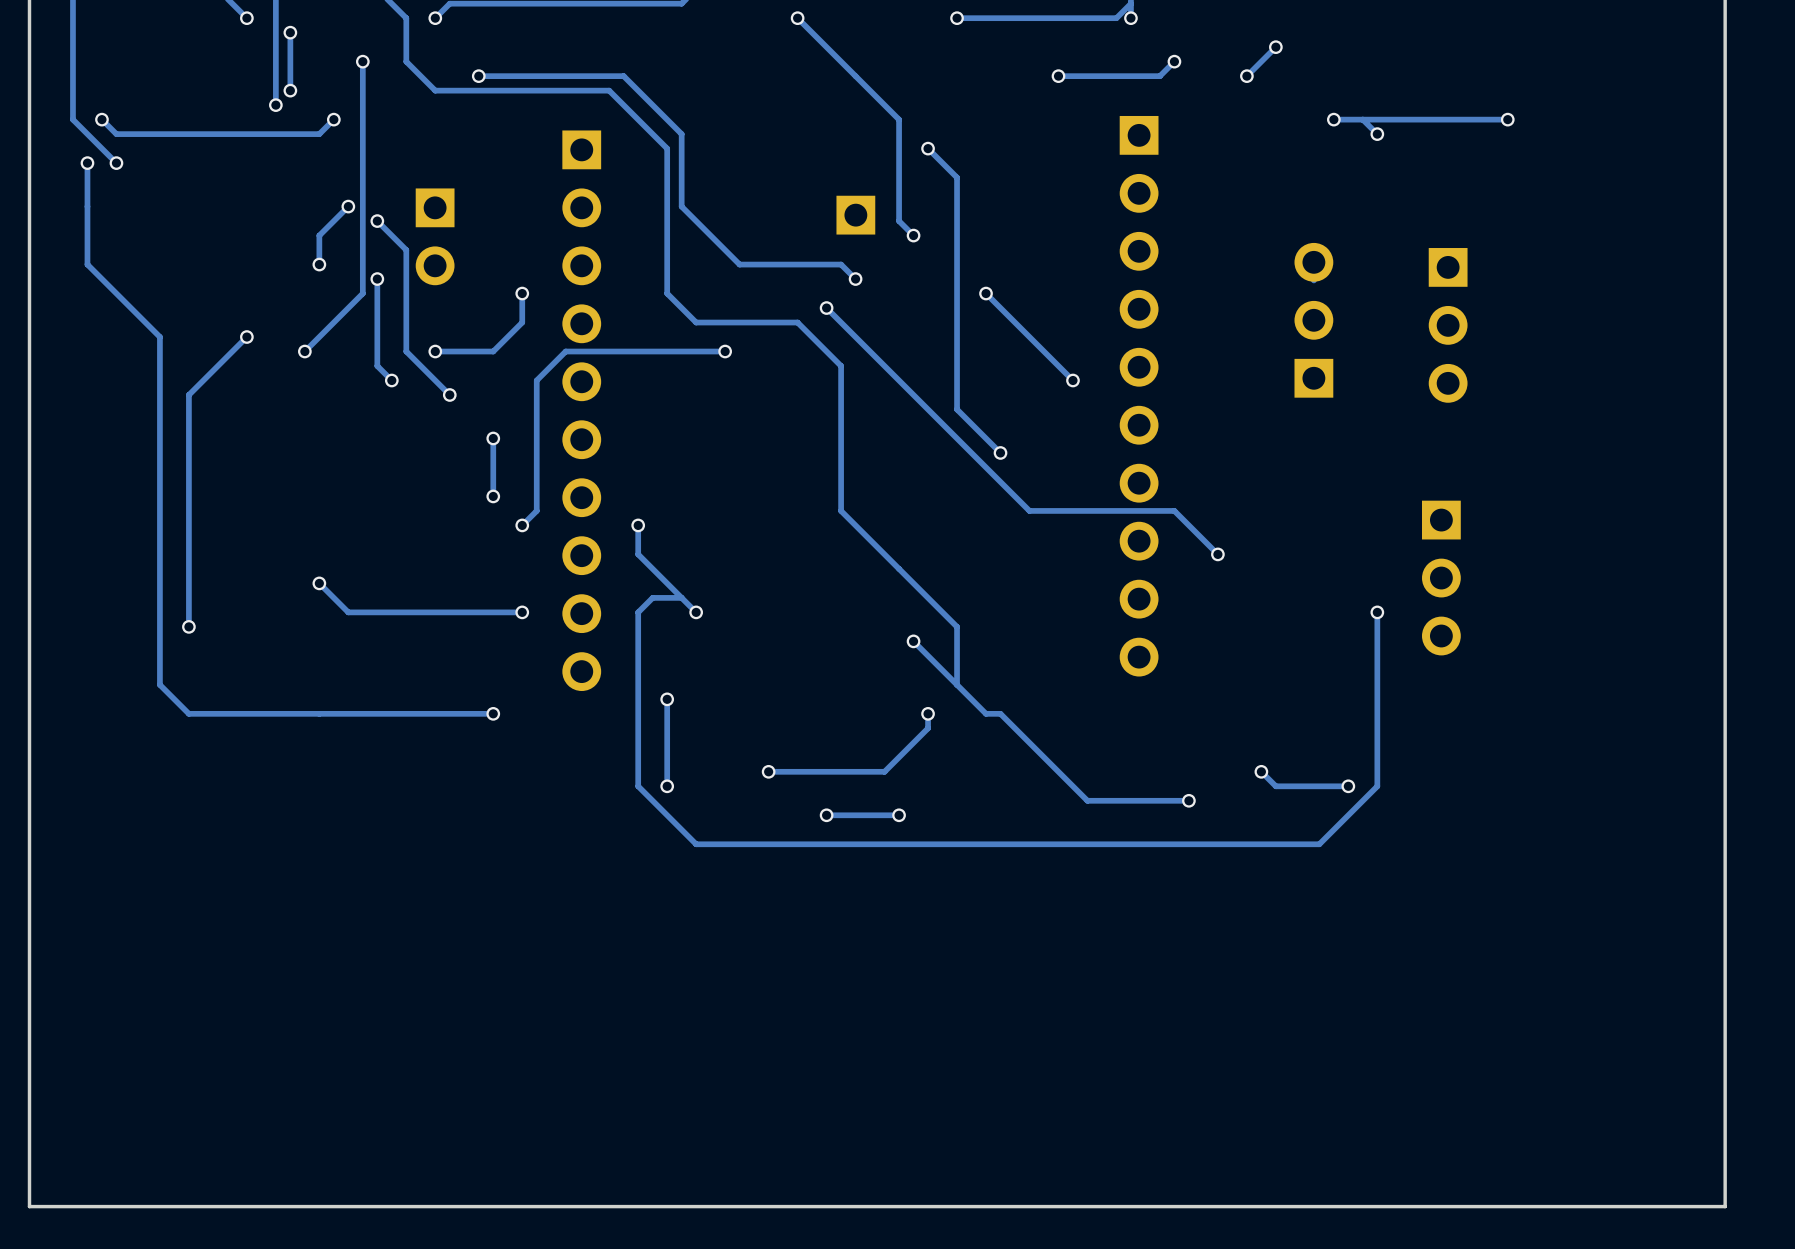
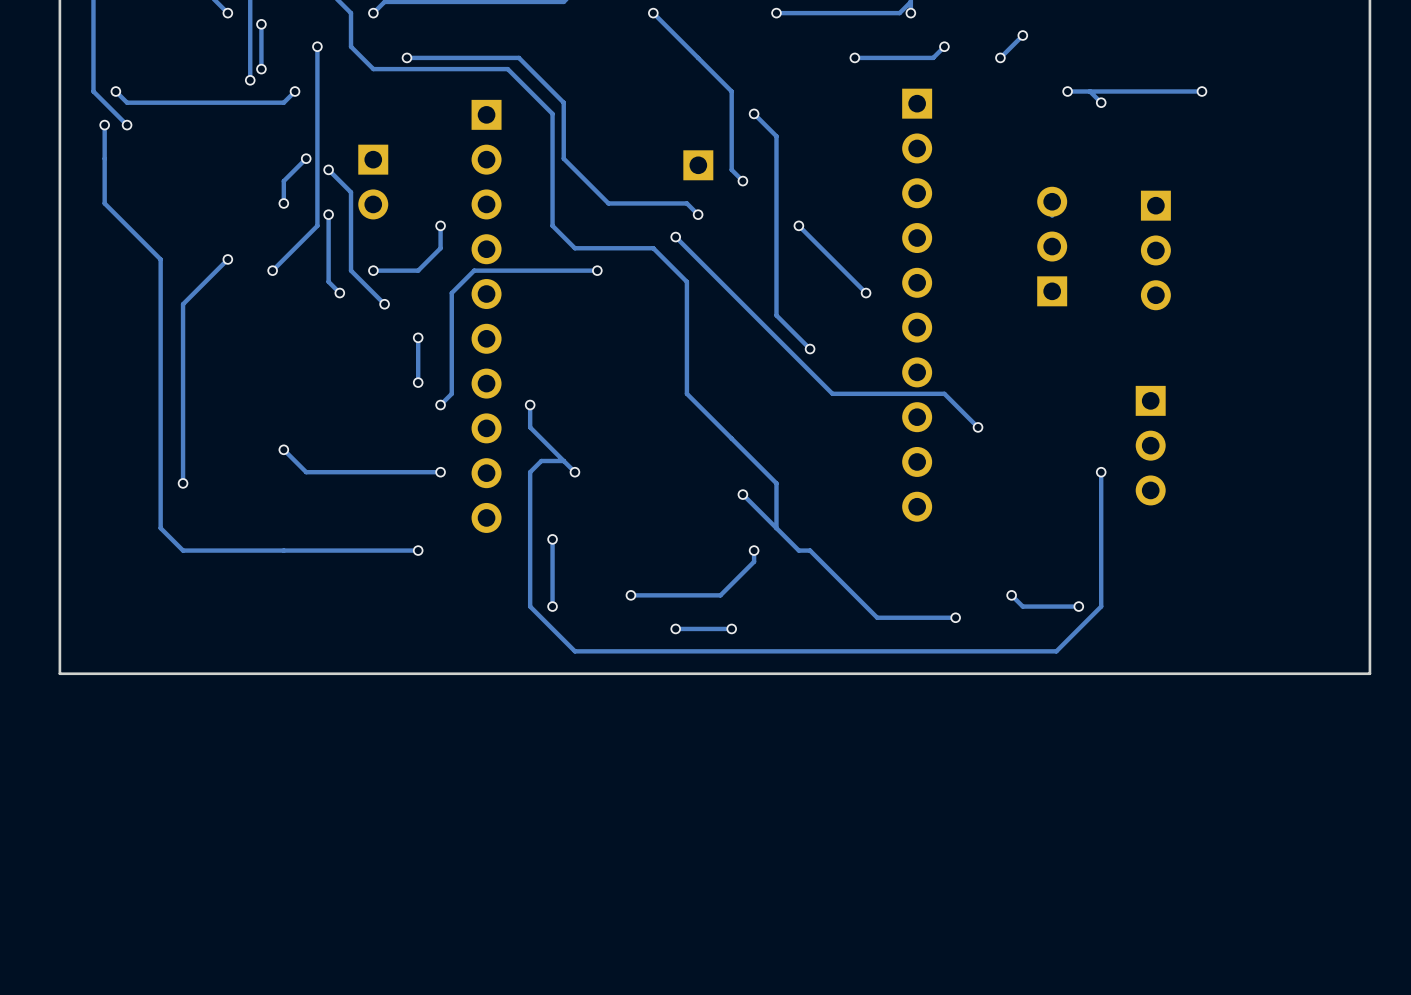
board edge: (1725, 873) (1725, 1206) (29, 1206) (29, 873) -> (1369, 673) (59, 673)

